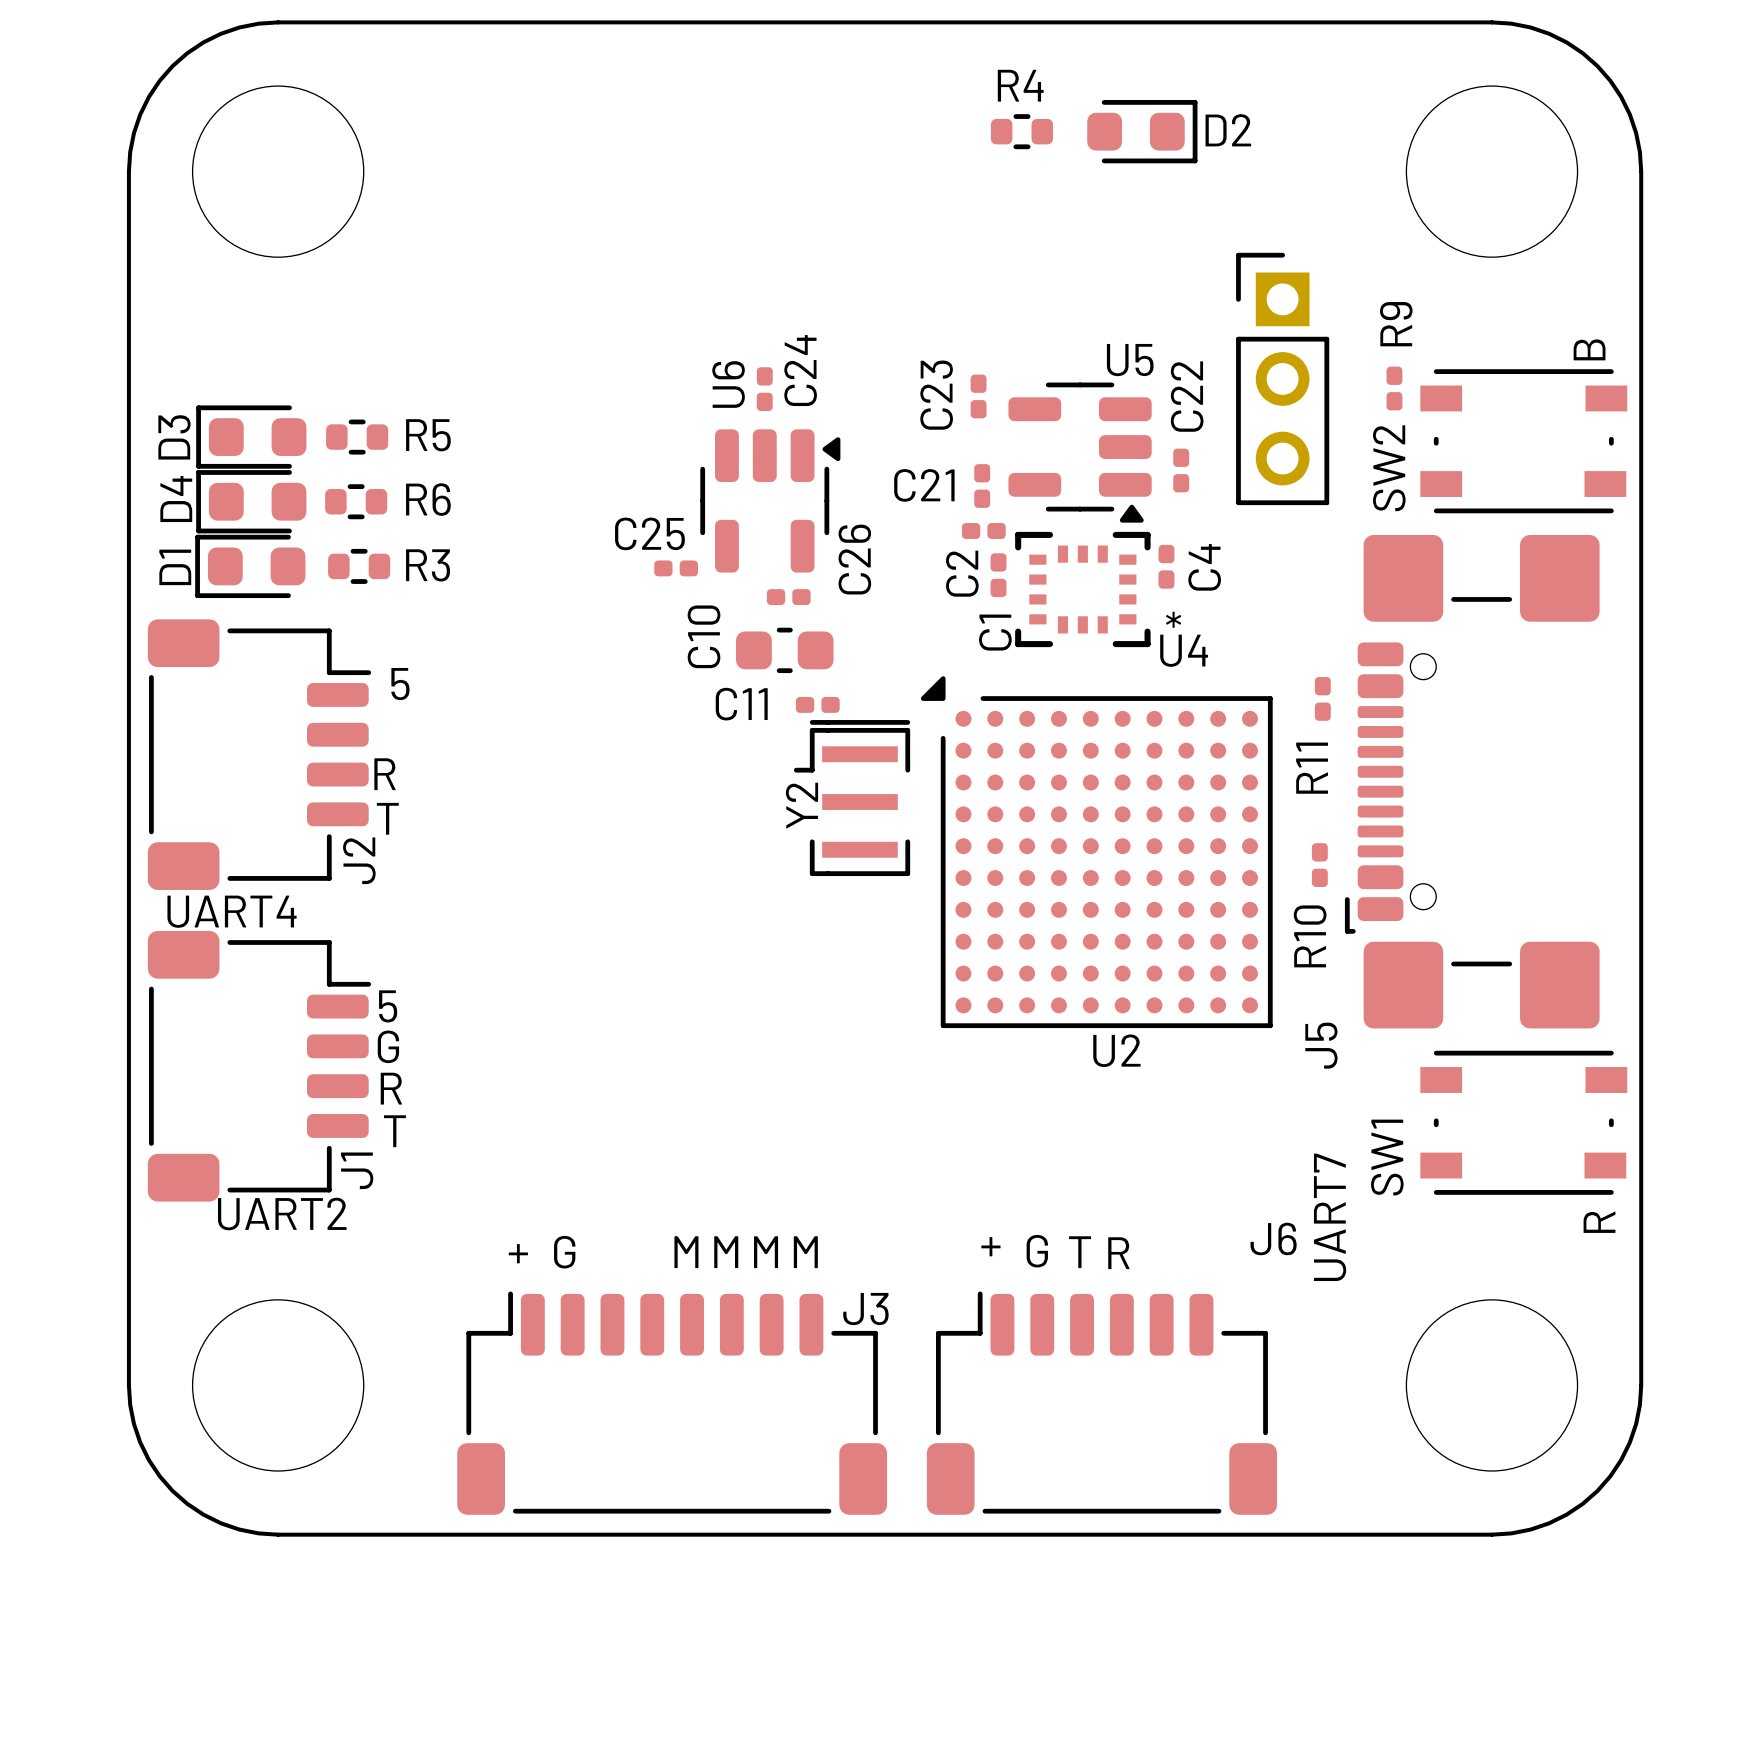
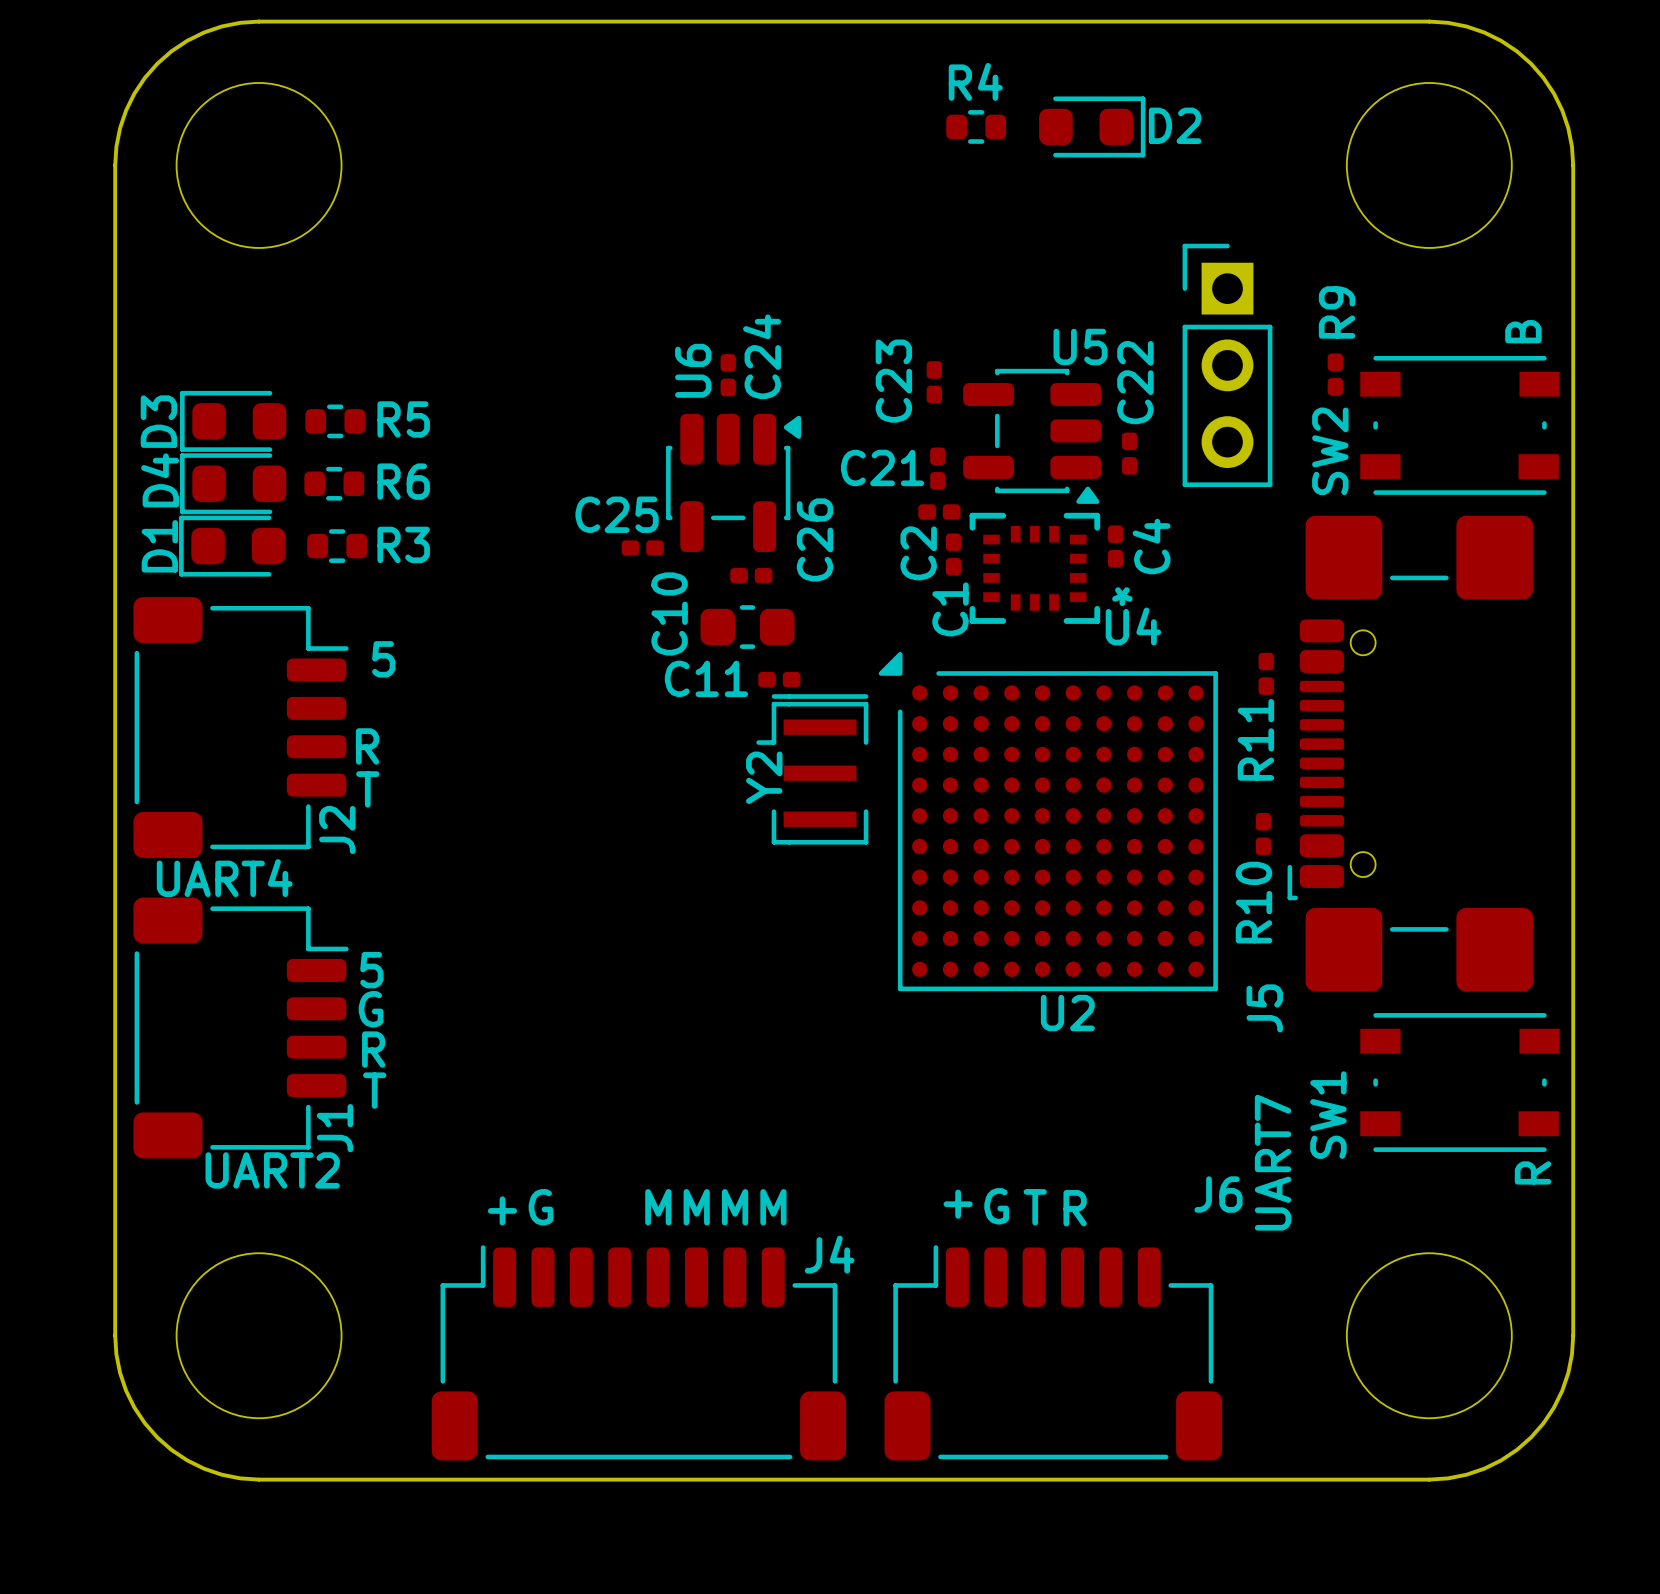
U5 footprint: [1008, 382, 1152, 523] -> [963, 368, 1102, 504]
U6 footprint: [700, 429, 841, 573] -> [666, 413, 802, 553]
J3 name: J3 (865, 1309) -> J4 (829, 1254)

